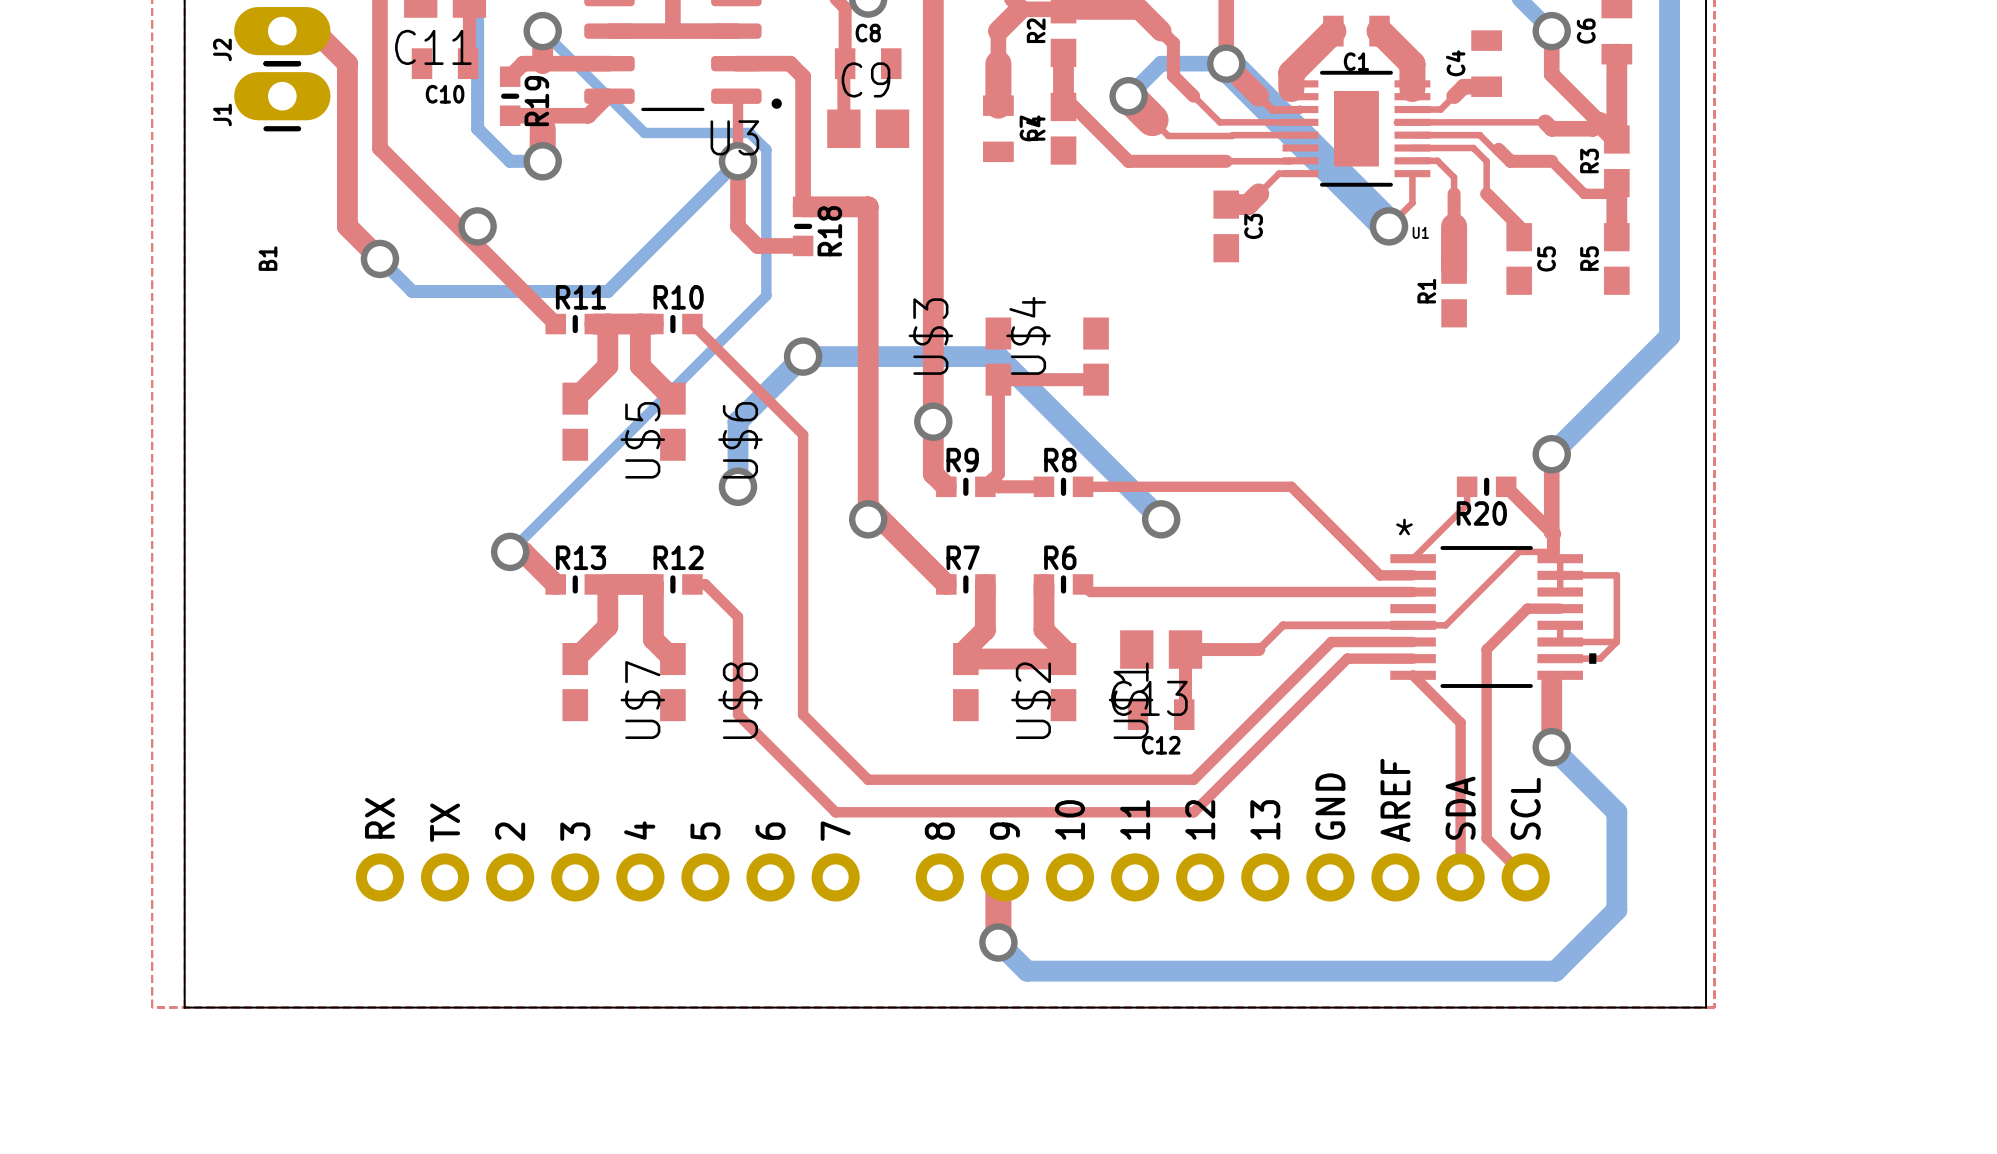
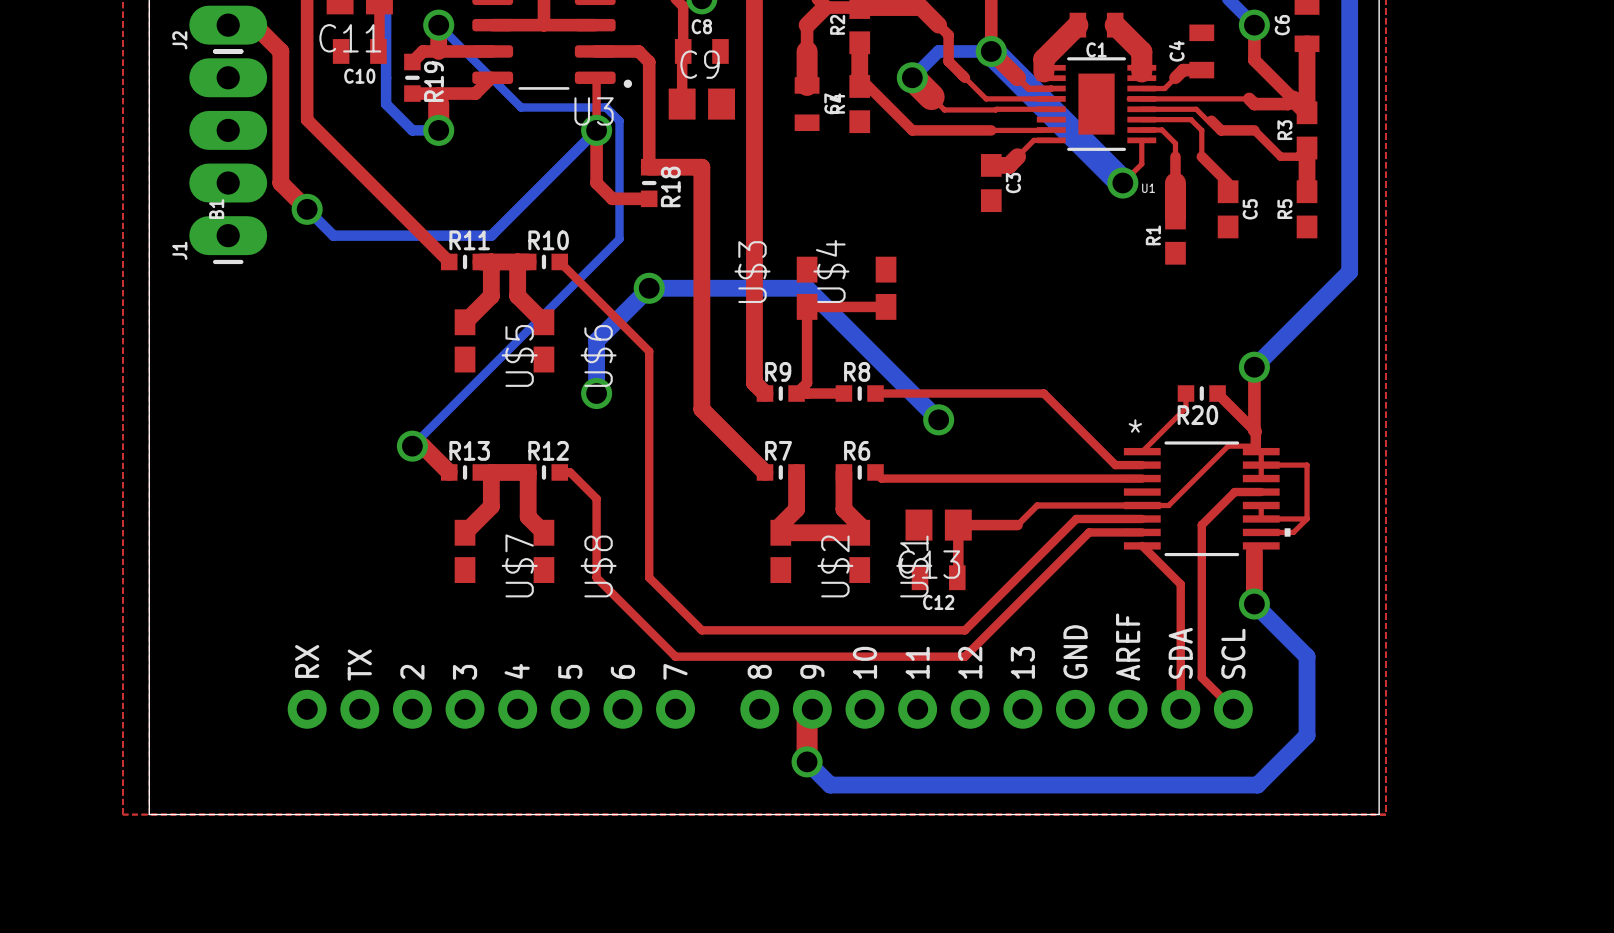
J1 footprint: [234, 61, 331, 132] -> [189, 49, 268, 265]
J1 name position: J1 (222, 114) -> J1 (179, 250)
via: (477, 226) -> none
via: (933, 421) -> none
via: (868, 519) -> none

